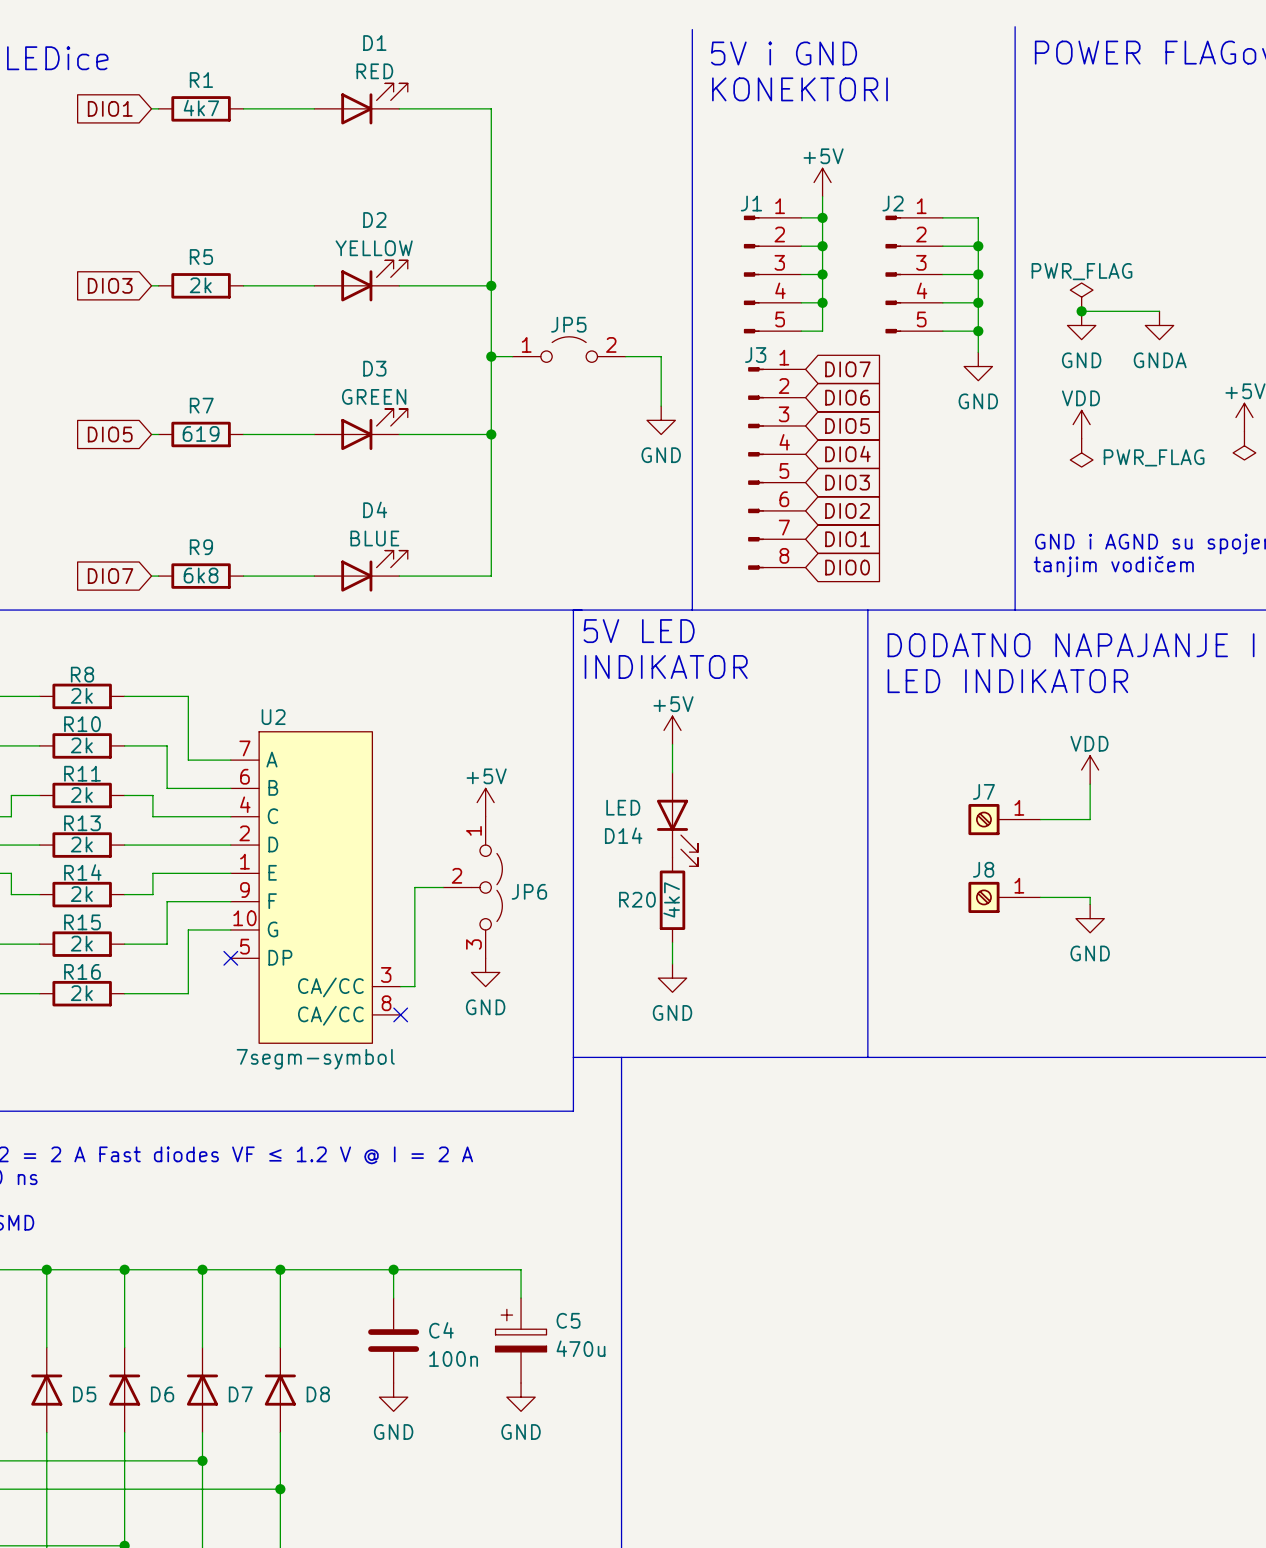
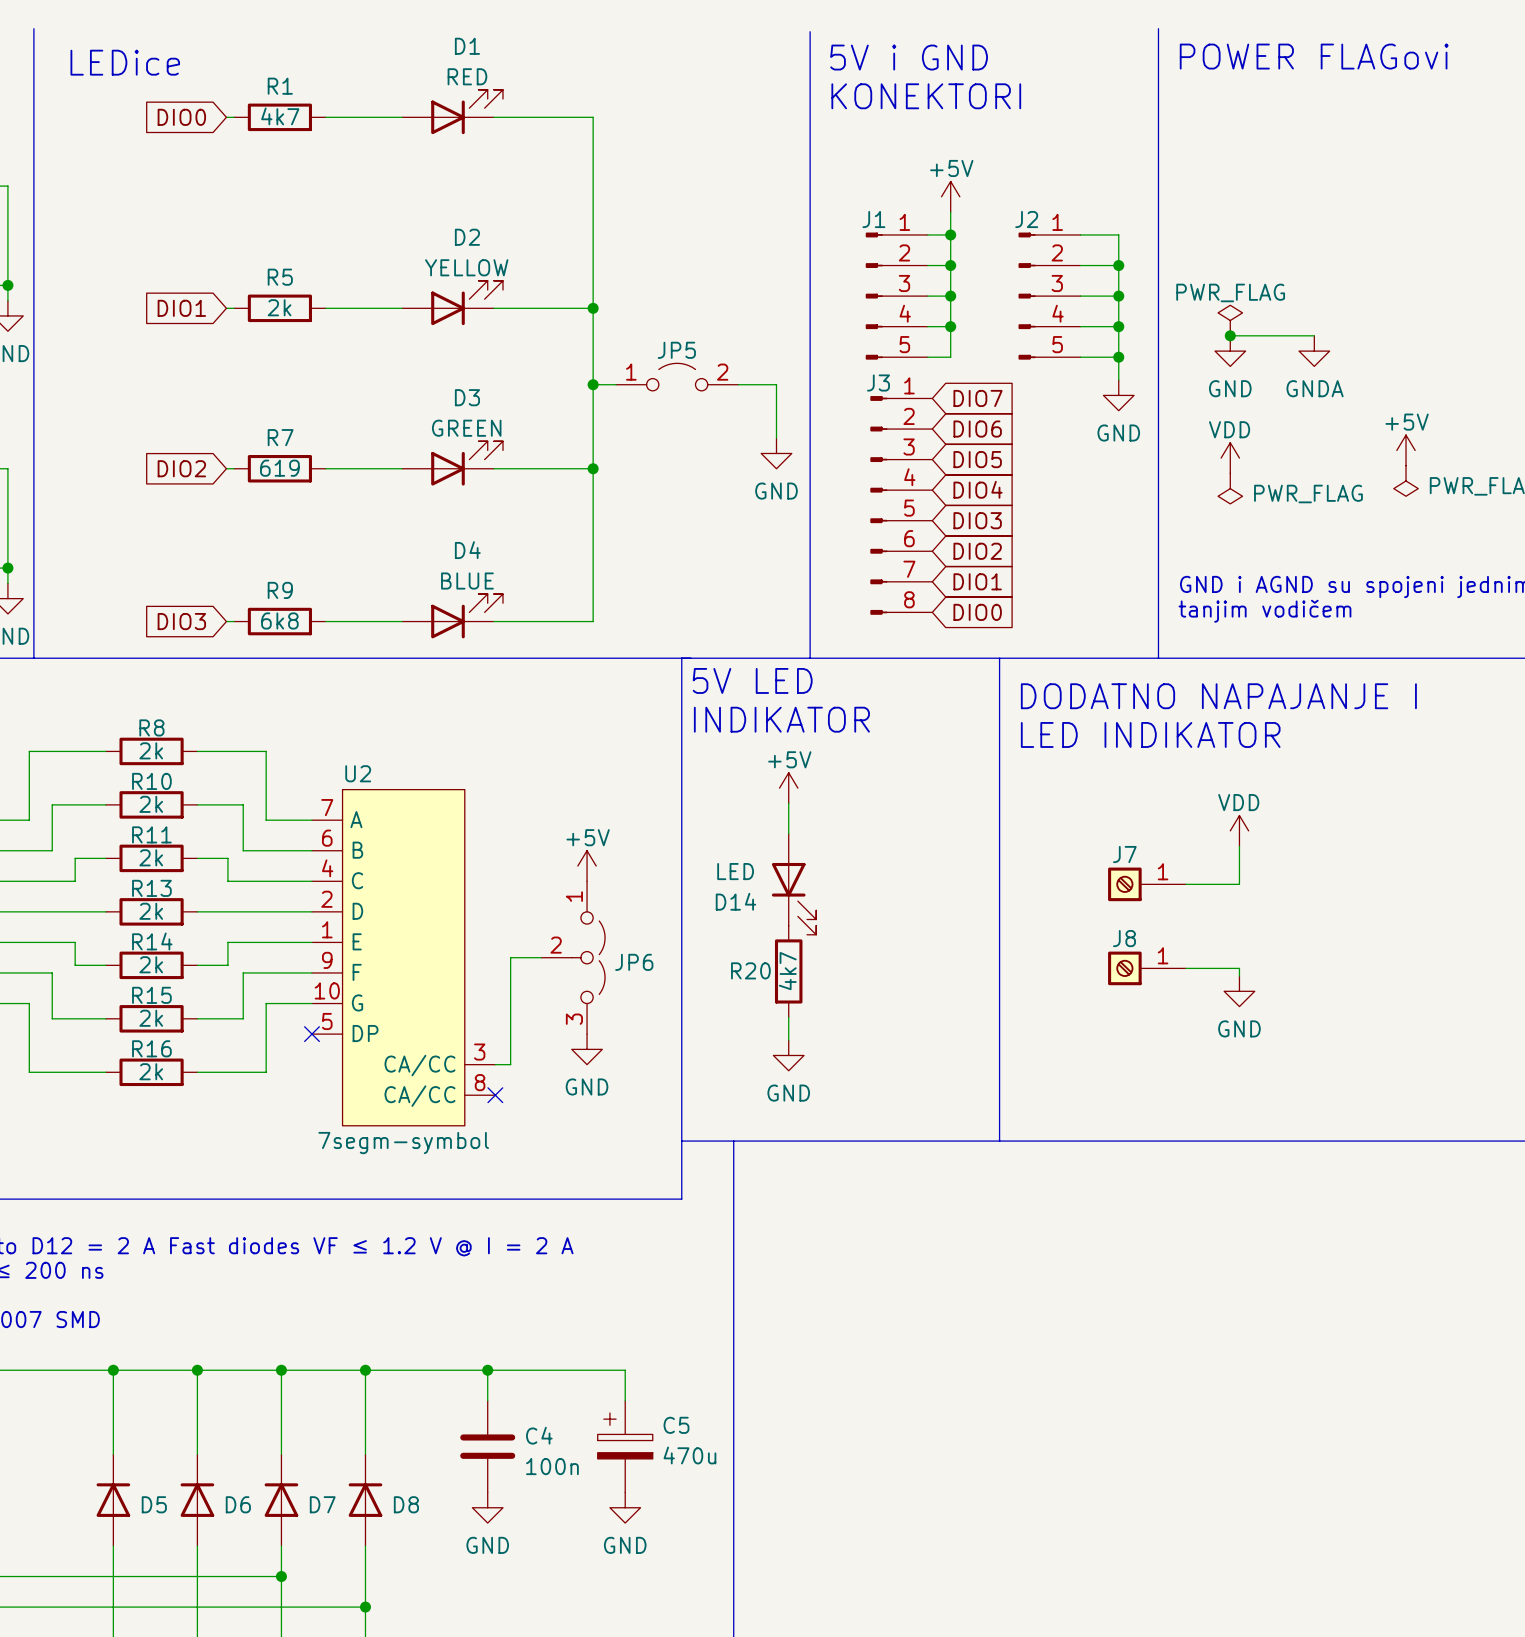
global label: DIO1 (110, 108) -> DIO0 (181, 117)
global label: DIO3 (110, 285) -> DIO1 (181, 308)
global label: DIO5 (110, 434) -> DIO2 (181, 468)
global label: DIO7 (110, 576) -> DIO3 (181, 621)

